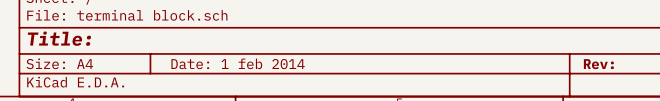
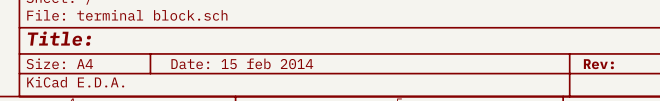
title block: Date: 1 feb 2014 (238, 63) -> Date: 15 feb 2014 (242, 63)

